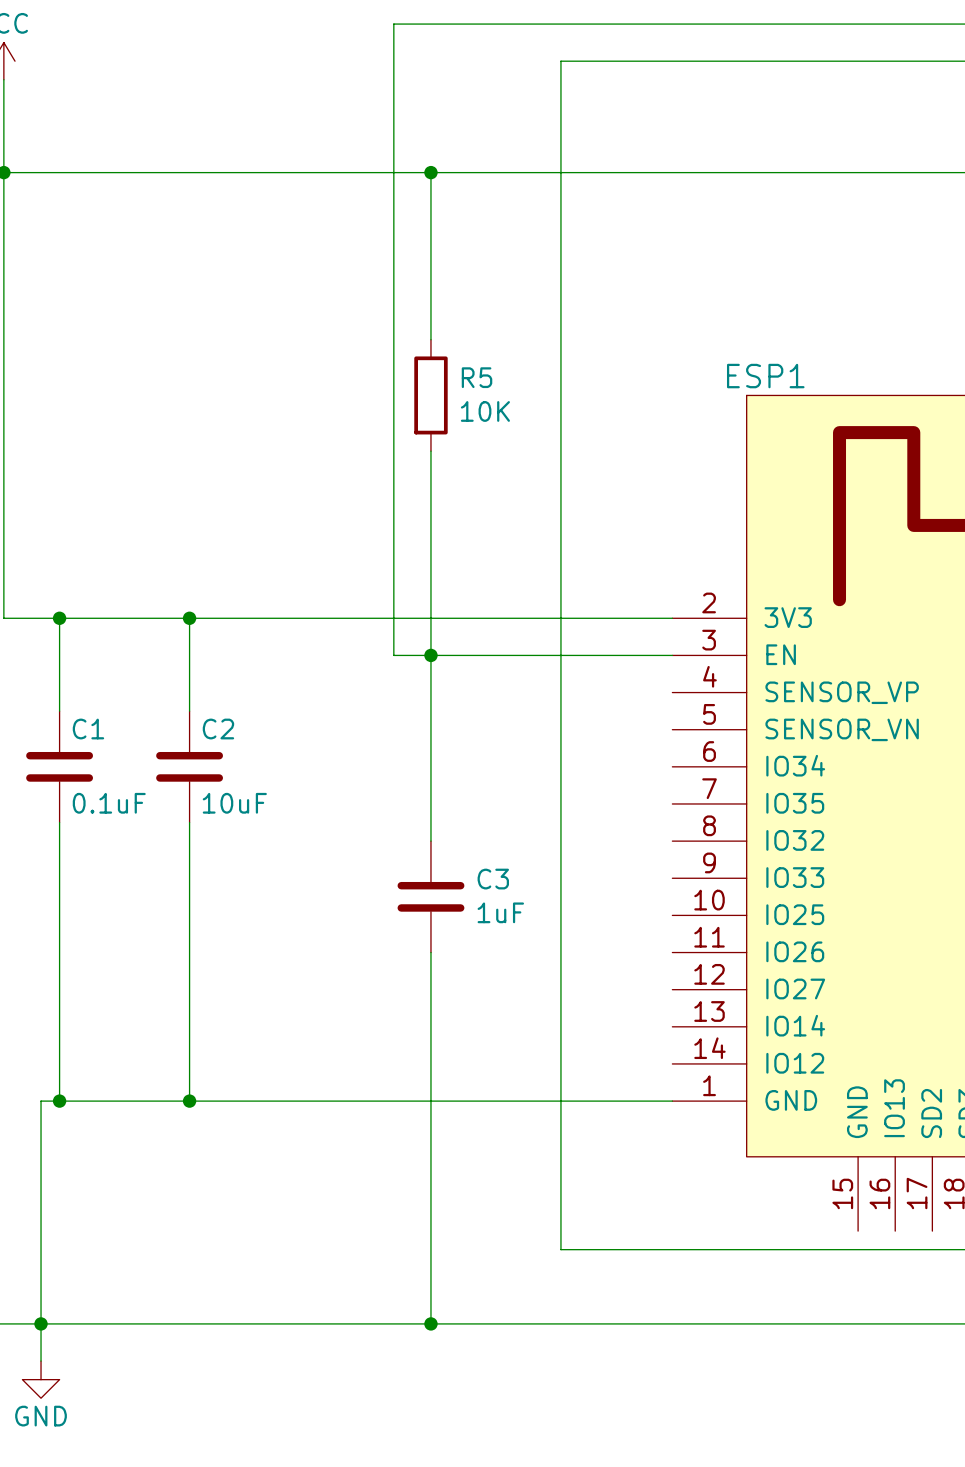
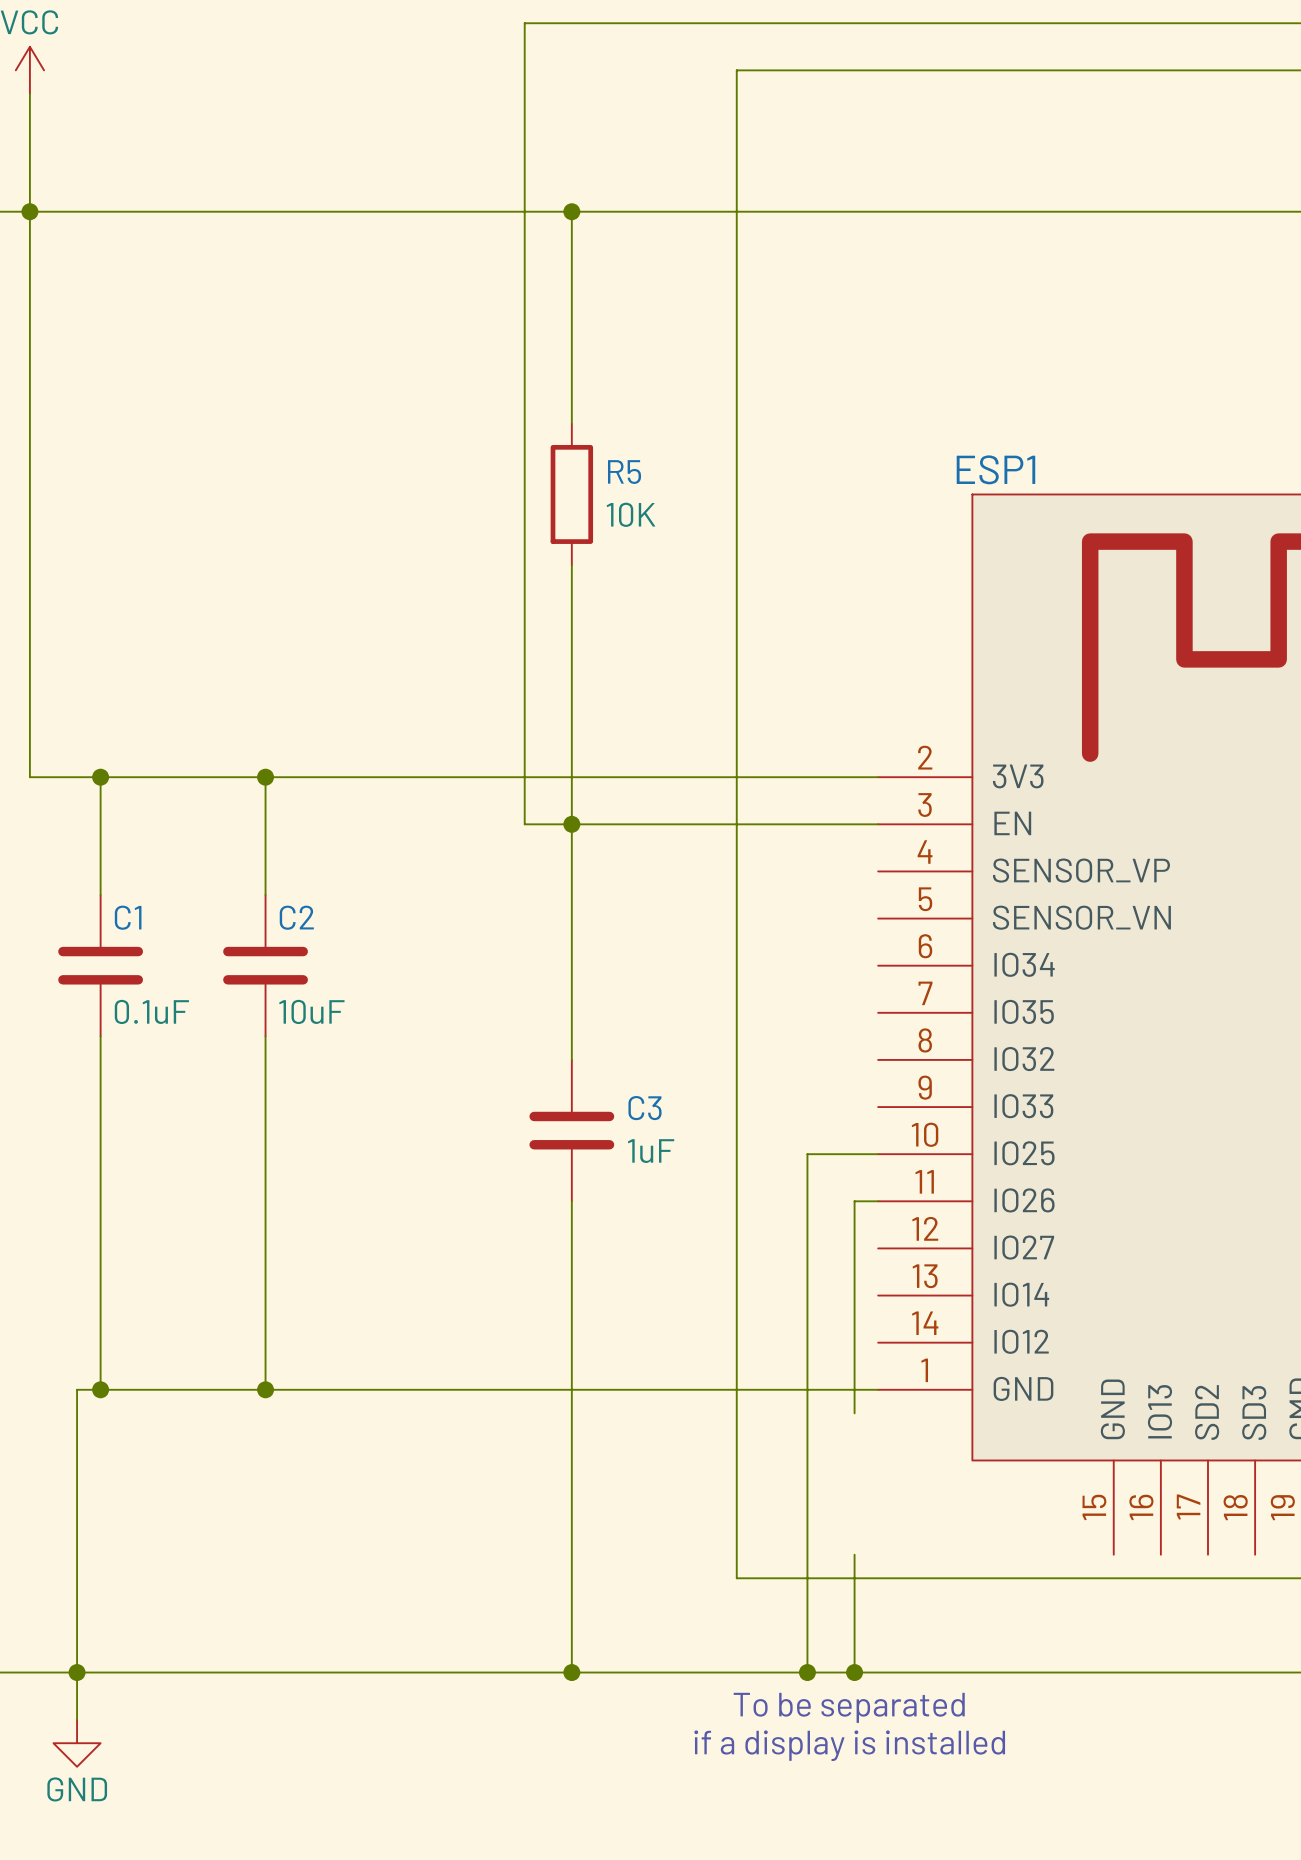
wire: none -> (878, 1154) (807, 1154) (807, 1672)
wire: none -> (878, 1201) (854, 1201) (854, 1413)
wire: none -> (854, 1554) (854, 1672)
junction: none -> (807, 1672)
junction: none -> (854, 1672)
text: none -> To be separated (849, 1707)
text: none -> if a display is installed (849, 1745)

